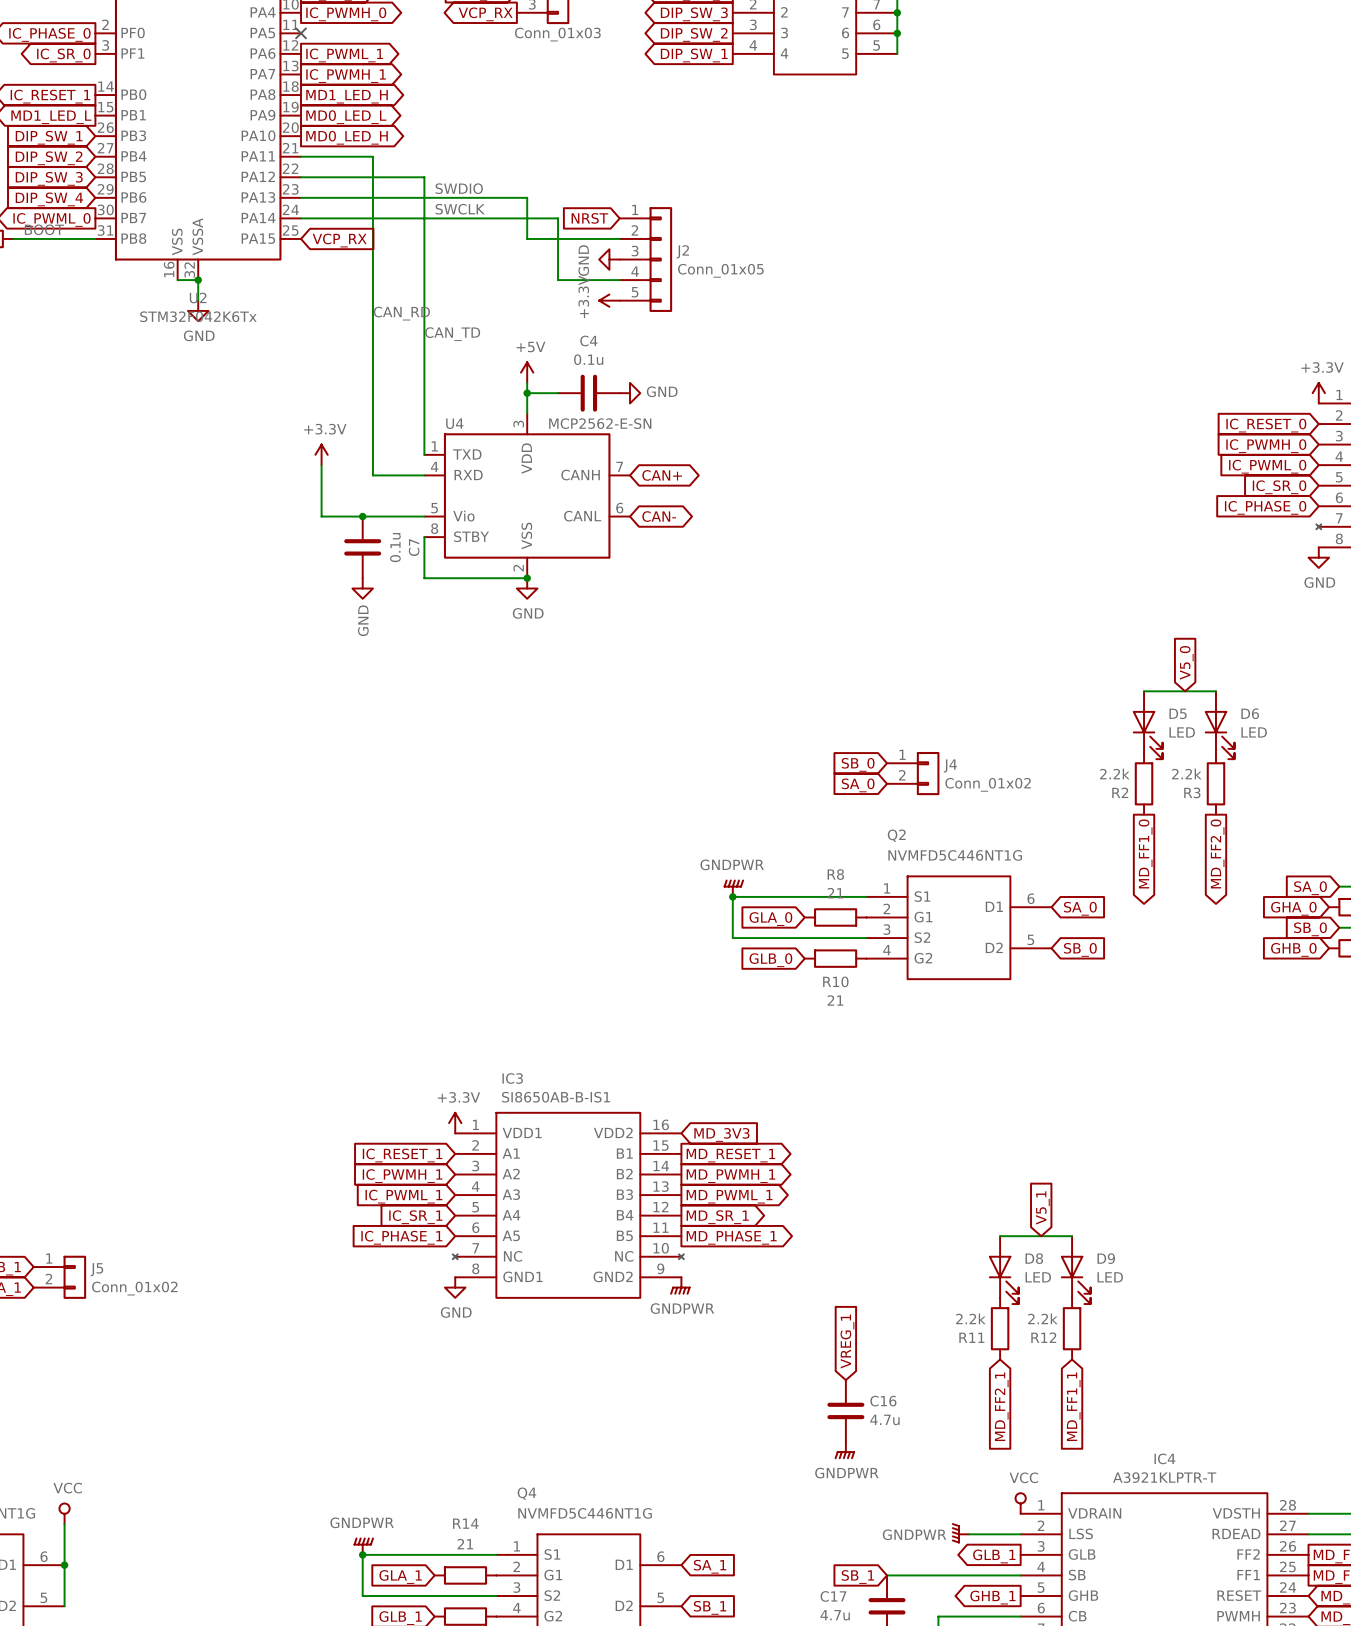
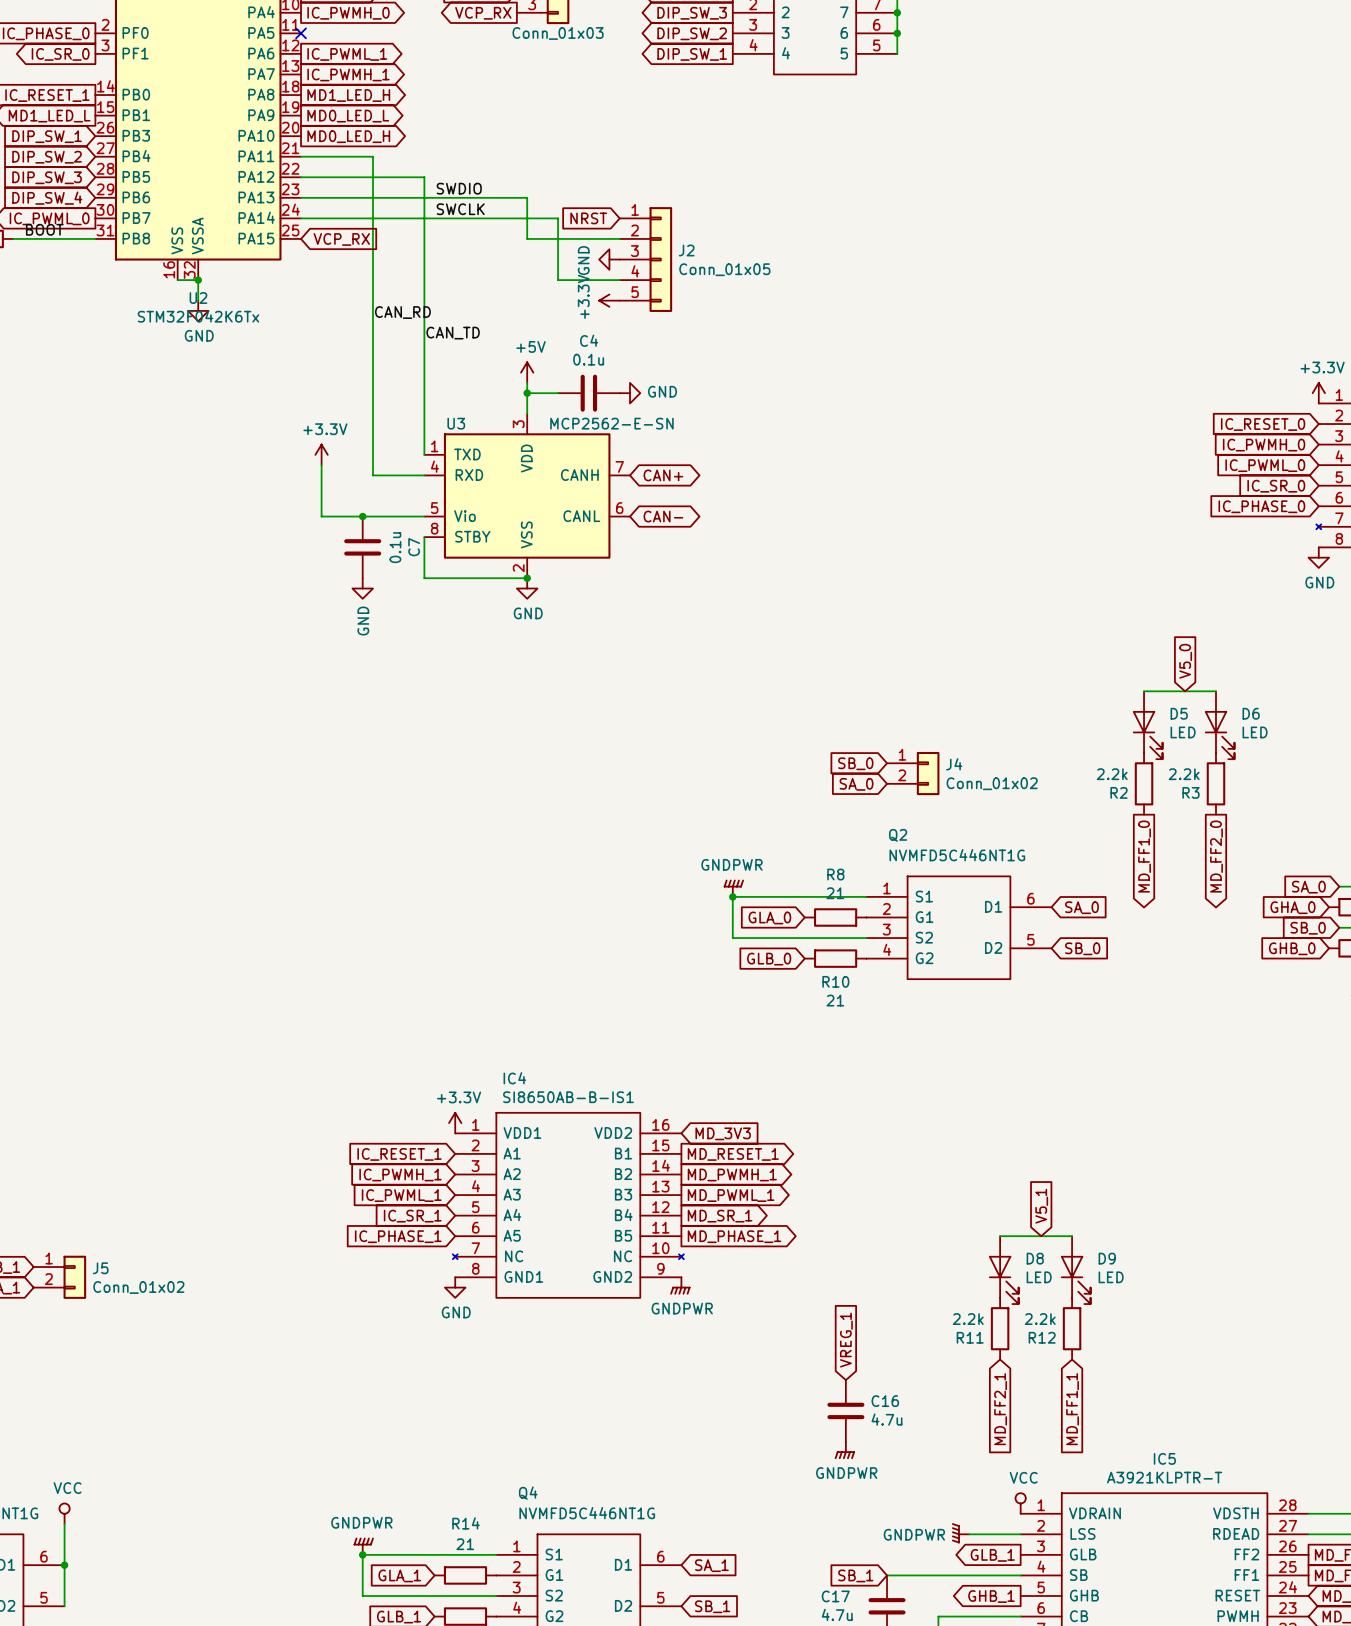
U4 name: U4 (454, 423) -> U3 (456, 423)
IC3 name: IC3 (512, 1078) -> IC4 (514, 1078)
IC4 name: IC4 (1164, 1458) -> IC5 (1164, 1458)

